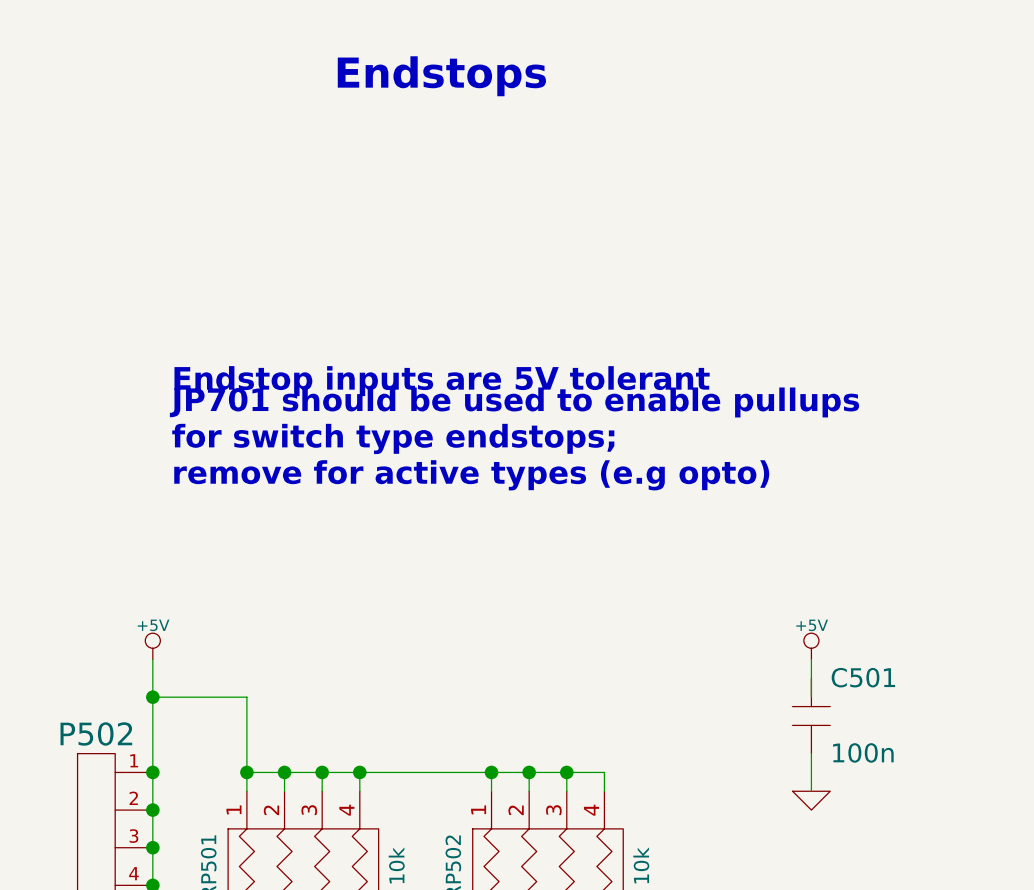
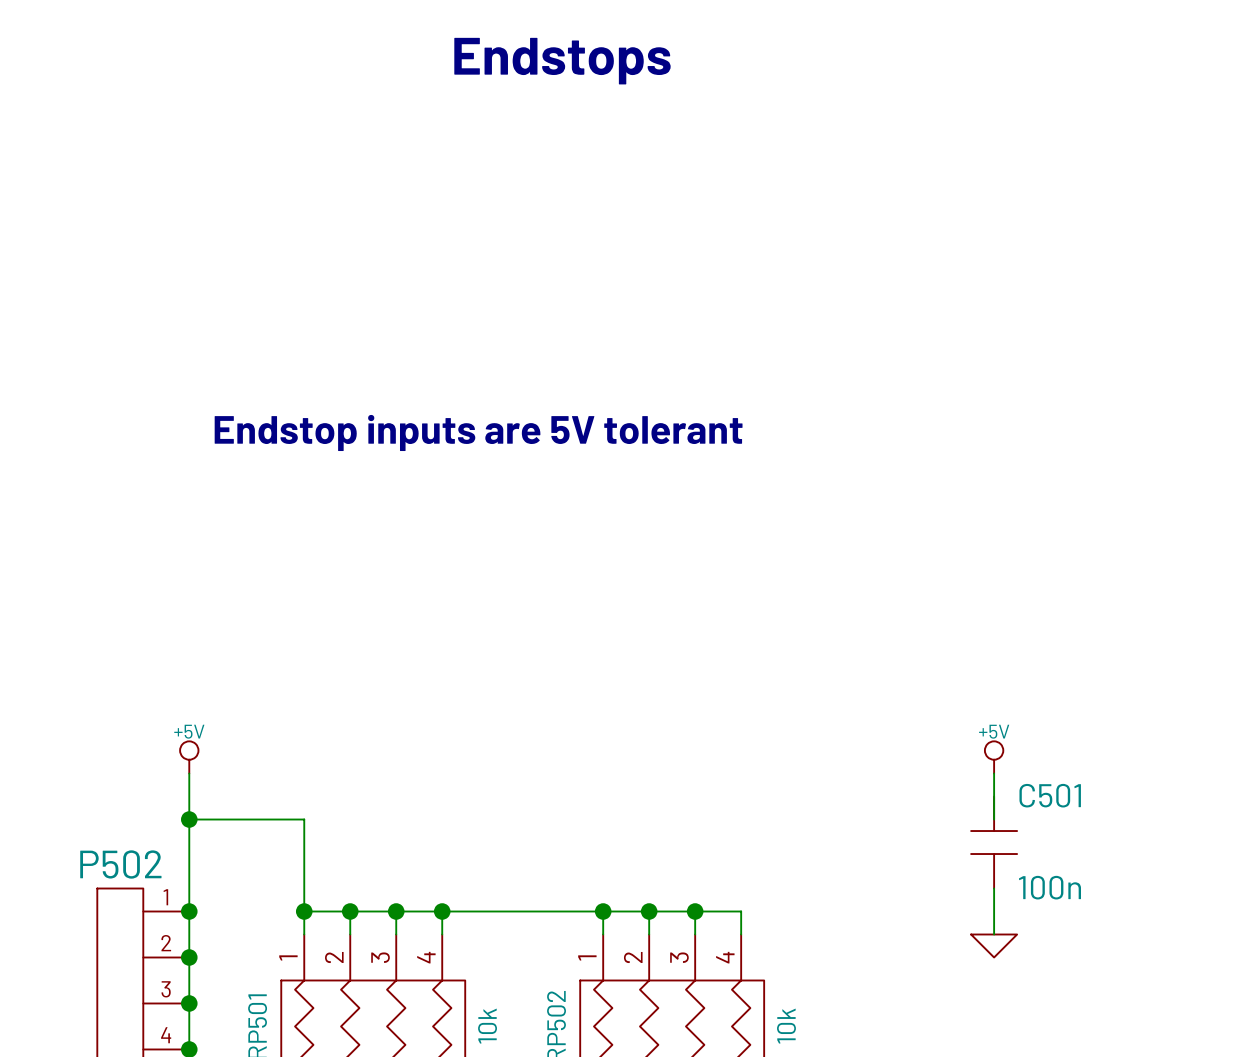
text: JP701 should be used to enable pullups (514, 402) -> none
text: for switch type endstops; (393, 438) -> none
text: remove for active types (e.g opto) (471, 475) -> none

